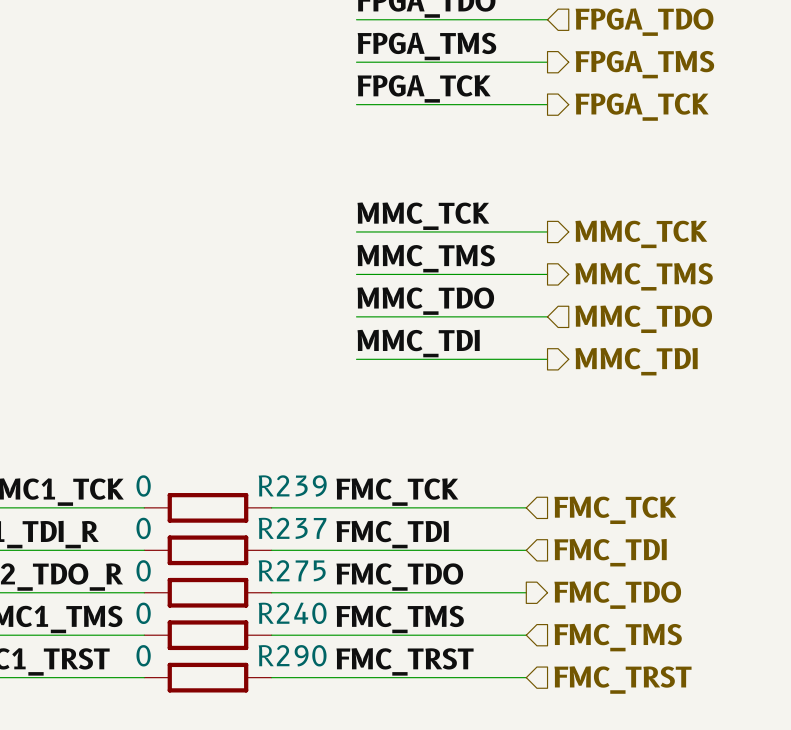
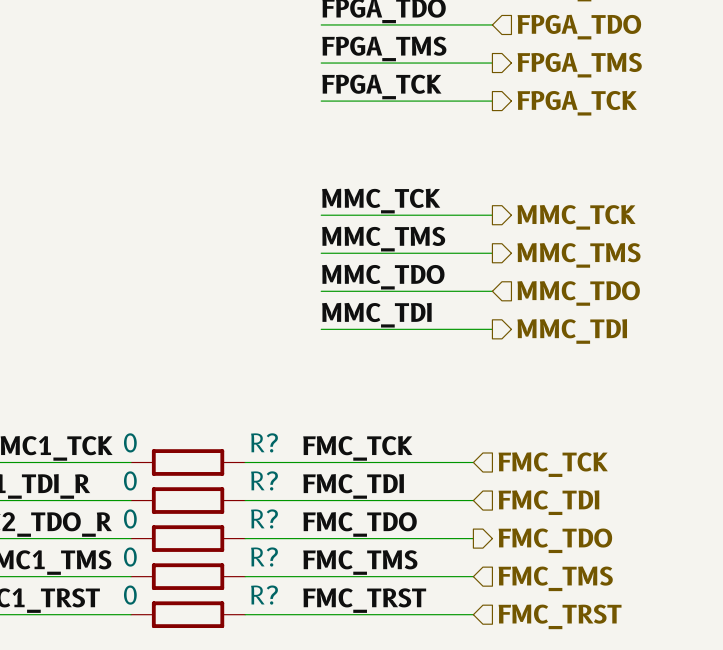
R239 name: R239 (292, 485) -> R? (264, 442)
R237 name: R237 (292, 528) -> R? (264, 480)
R275 name: R275 (292, 570) -> R? (264, 518)
R240 name: R240 (292, 613) -> R? (264, 557)
R290 name: R290 (292, 655) -> R? (264, 595)

